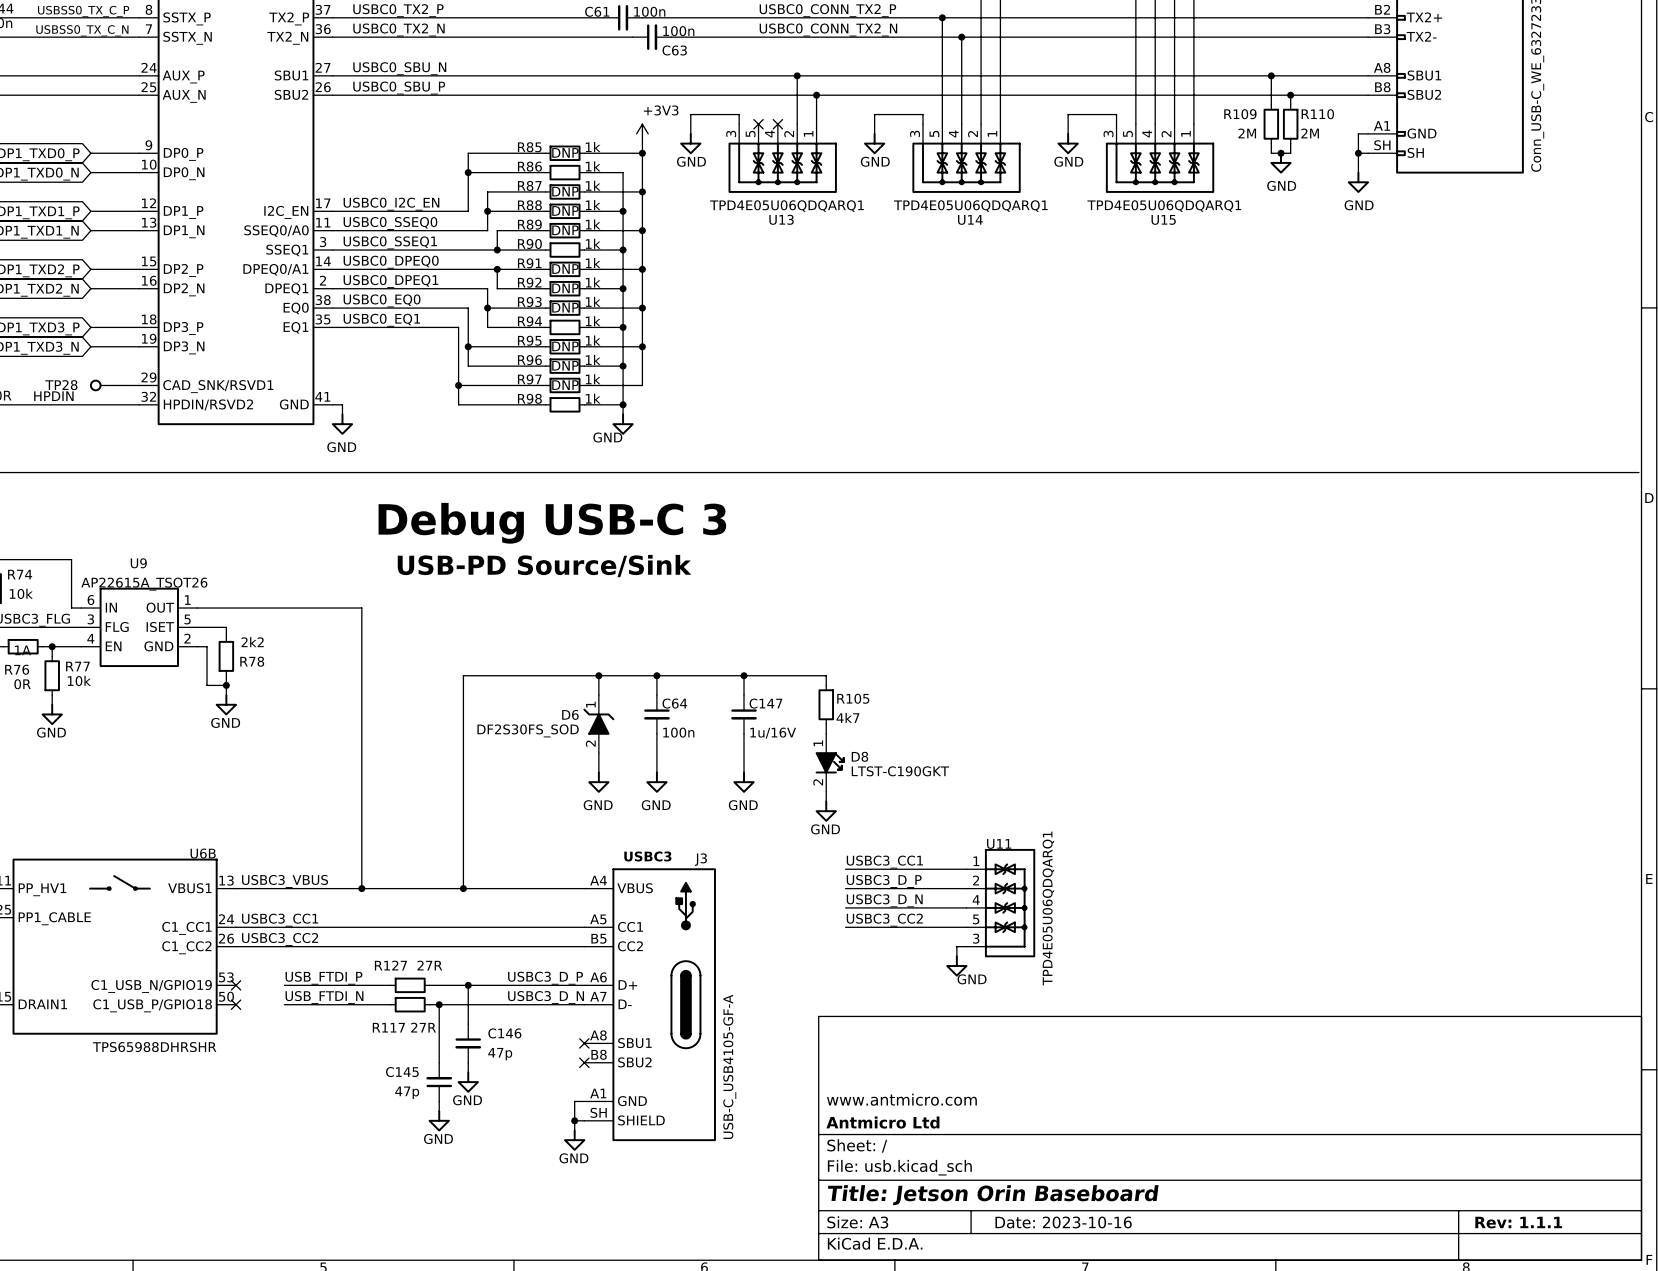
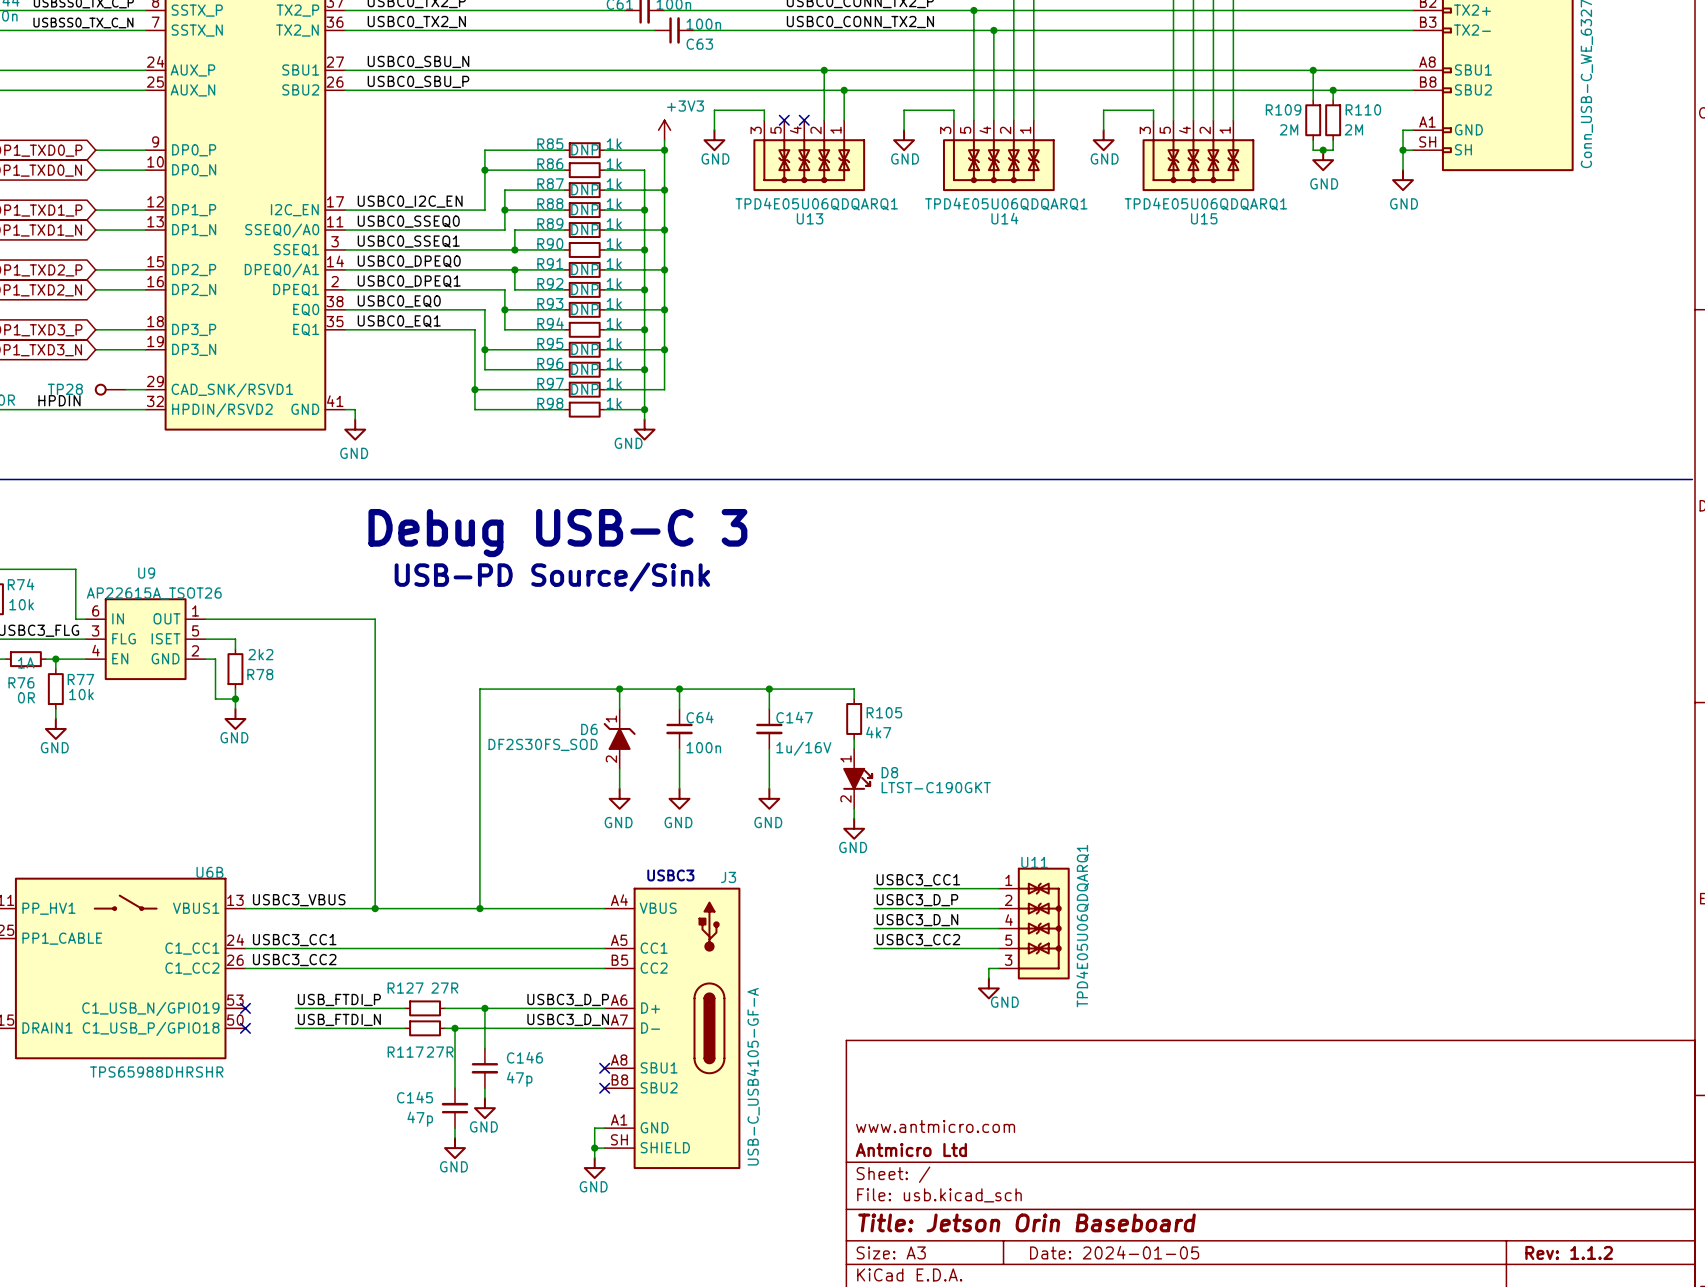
title block: Date: 2023-10-16 (1063, 1222) -> Date: 2024-01-05 (1114, 1252)
title block: Rev: 1.1.1 (1518, 1222) -> Rev: 1.1.2 (1569, 1252)

